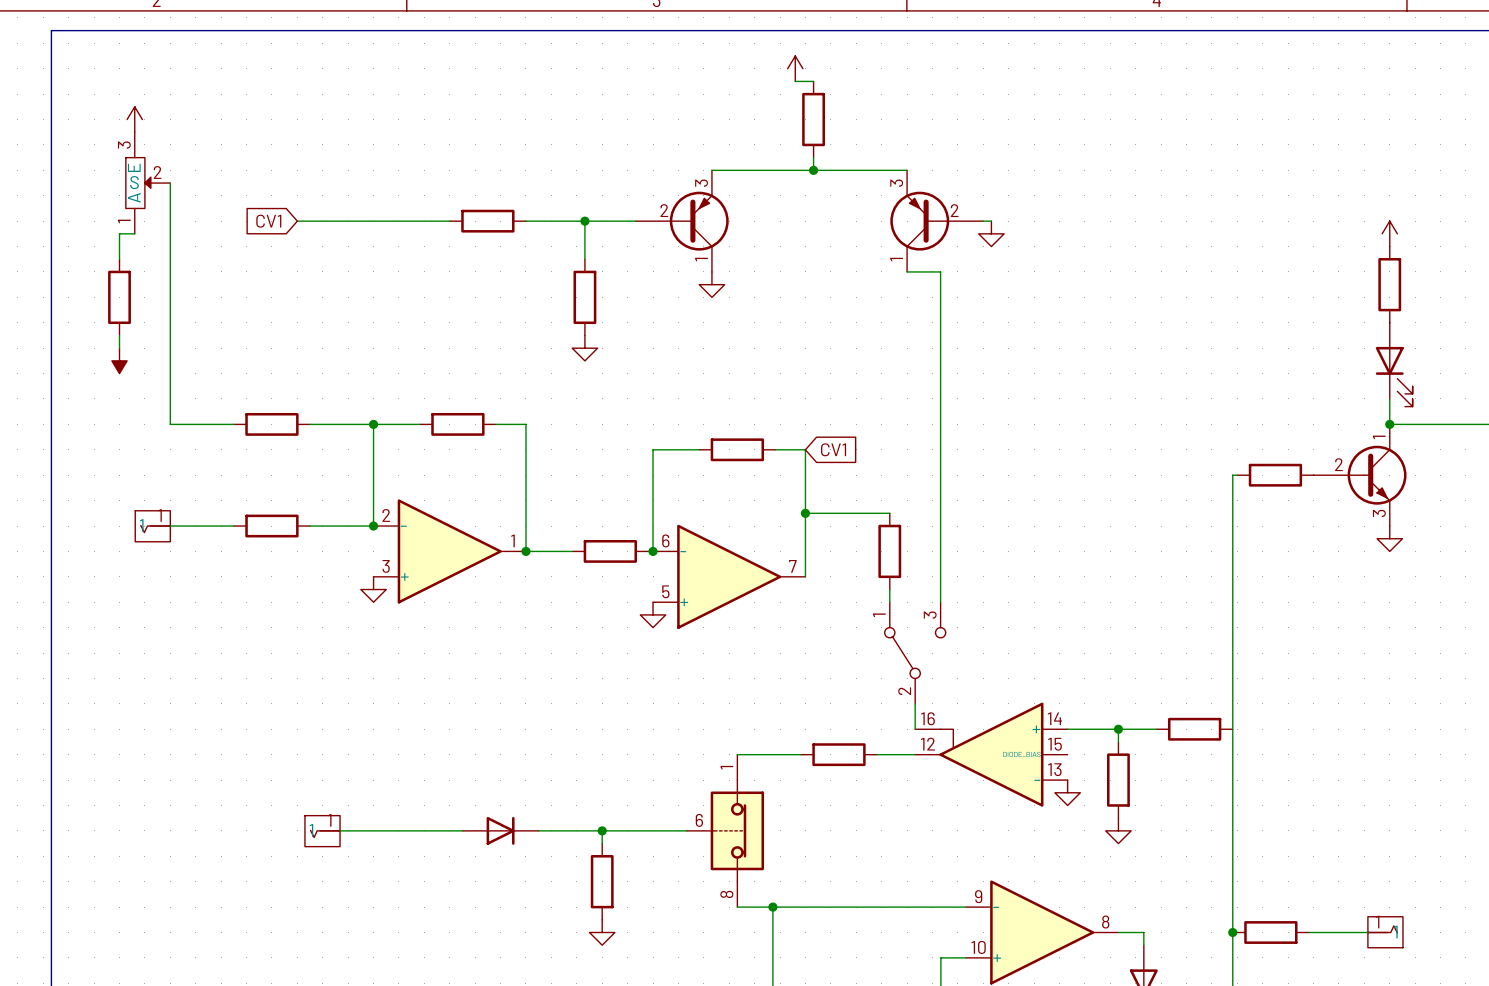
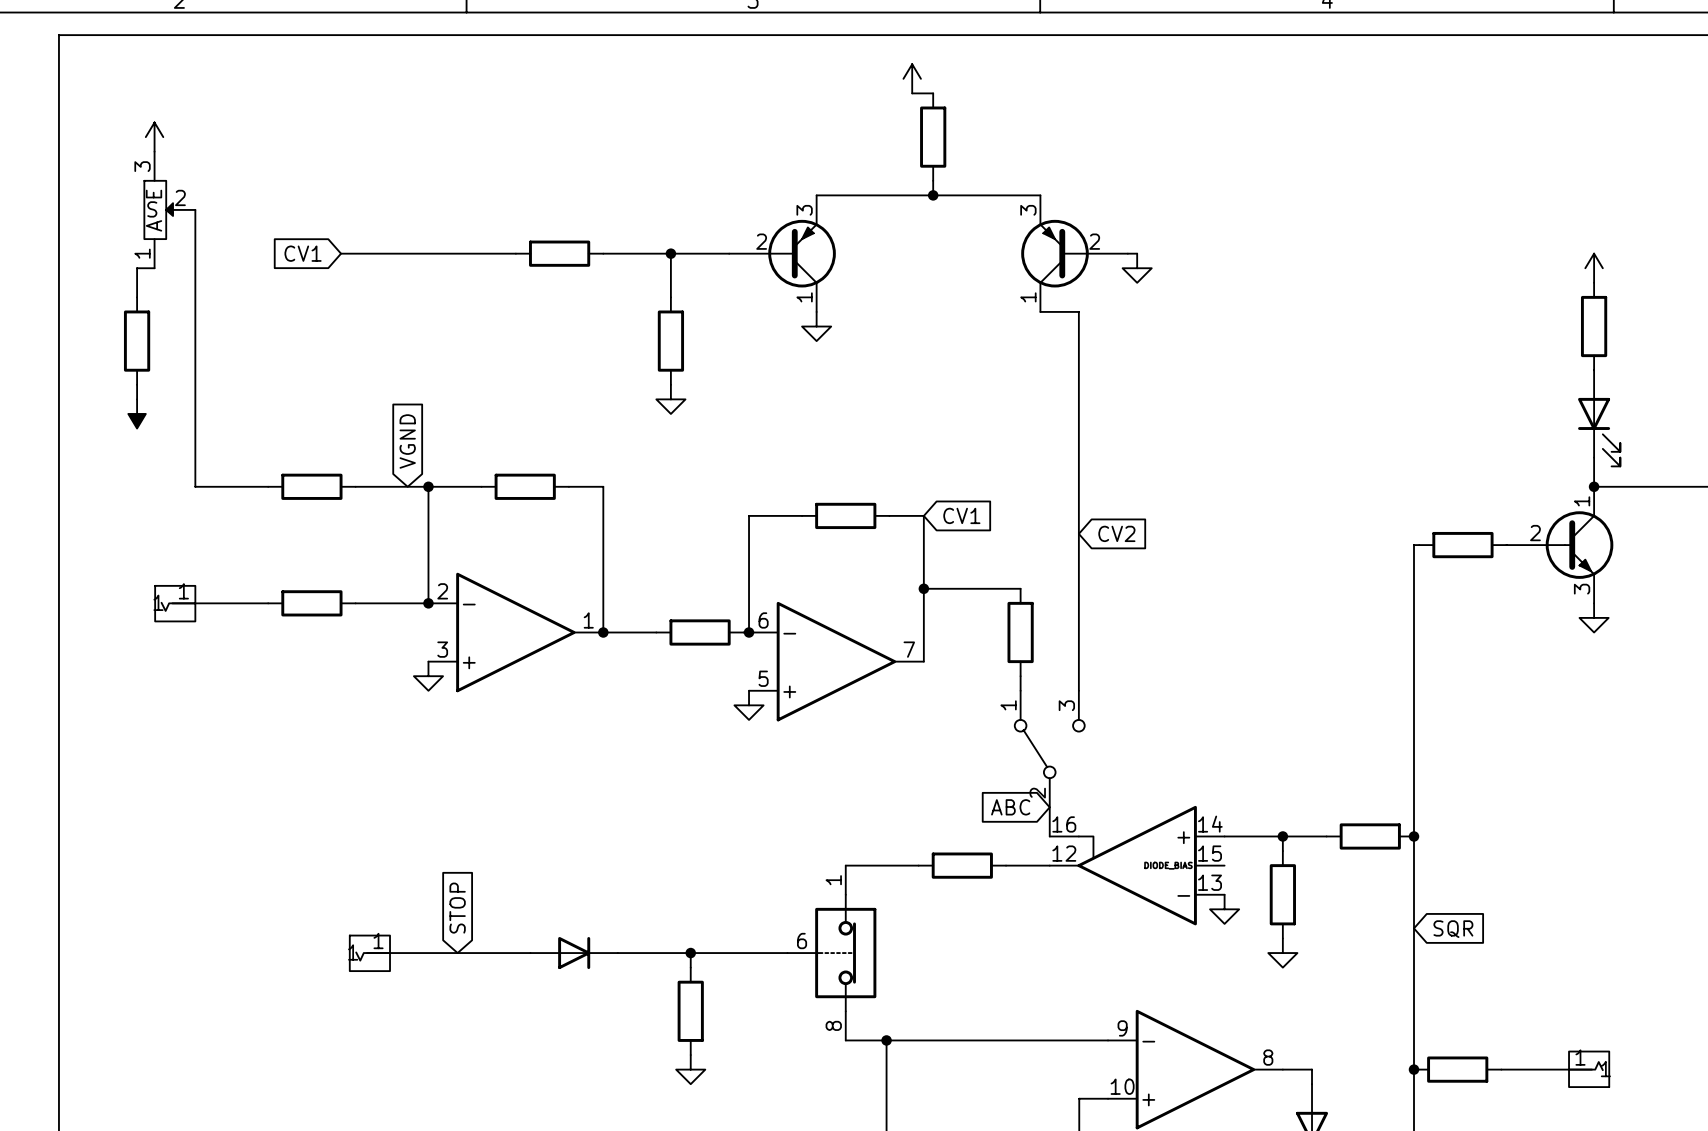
global label: none -> VGND (407, 441)
global label: none -> CV2 (1116, 533)
global label: none -> ABC (1010, 807)
junction: none -> (1414, 836)
global label: none -> STOP (457, 908)
global label: none -> SQR (1453, 929)

